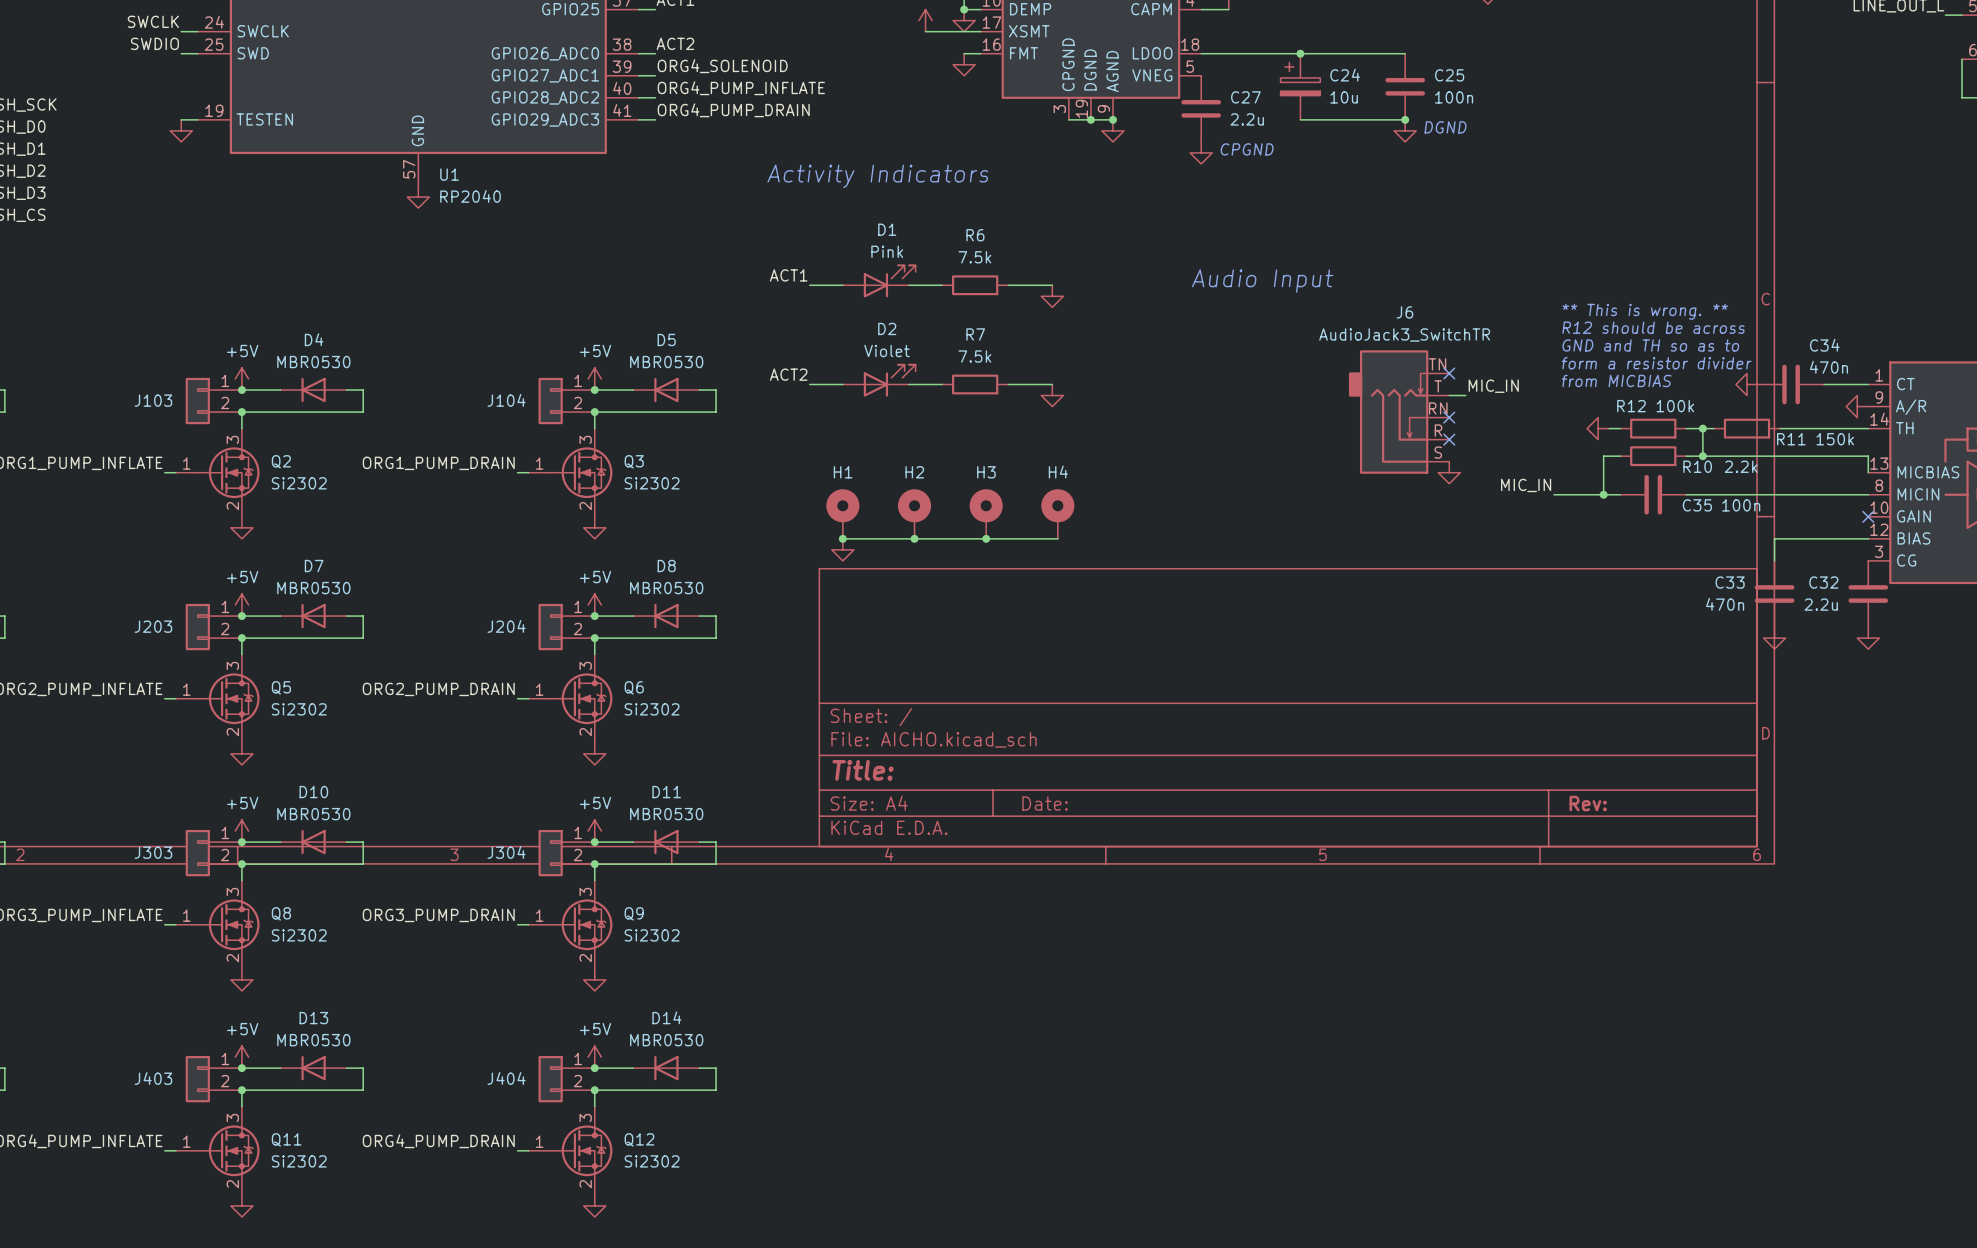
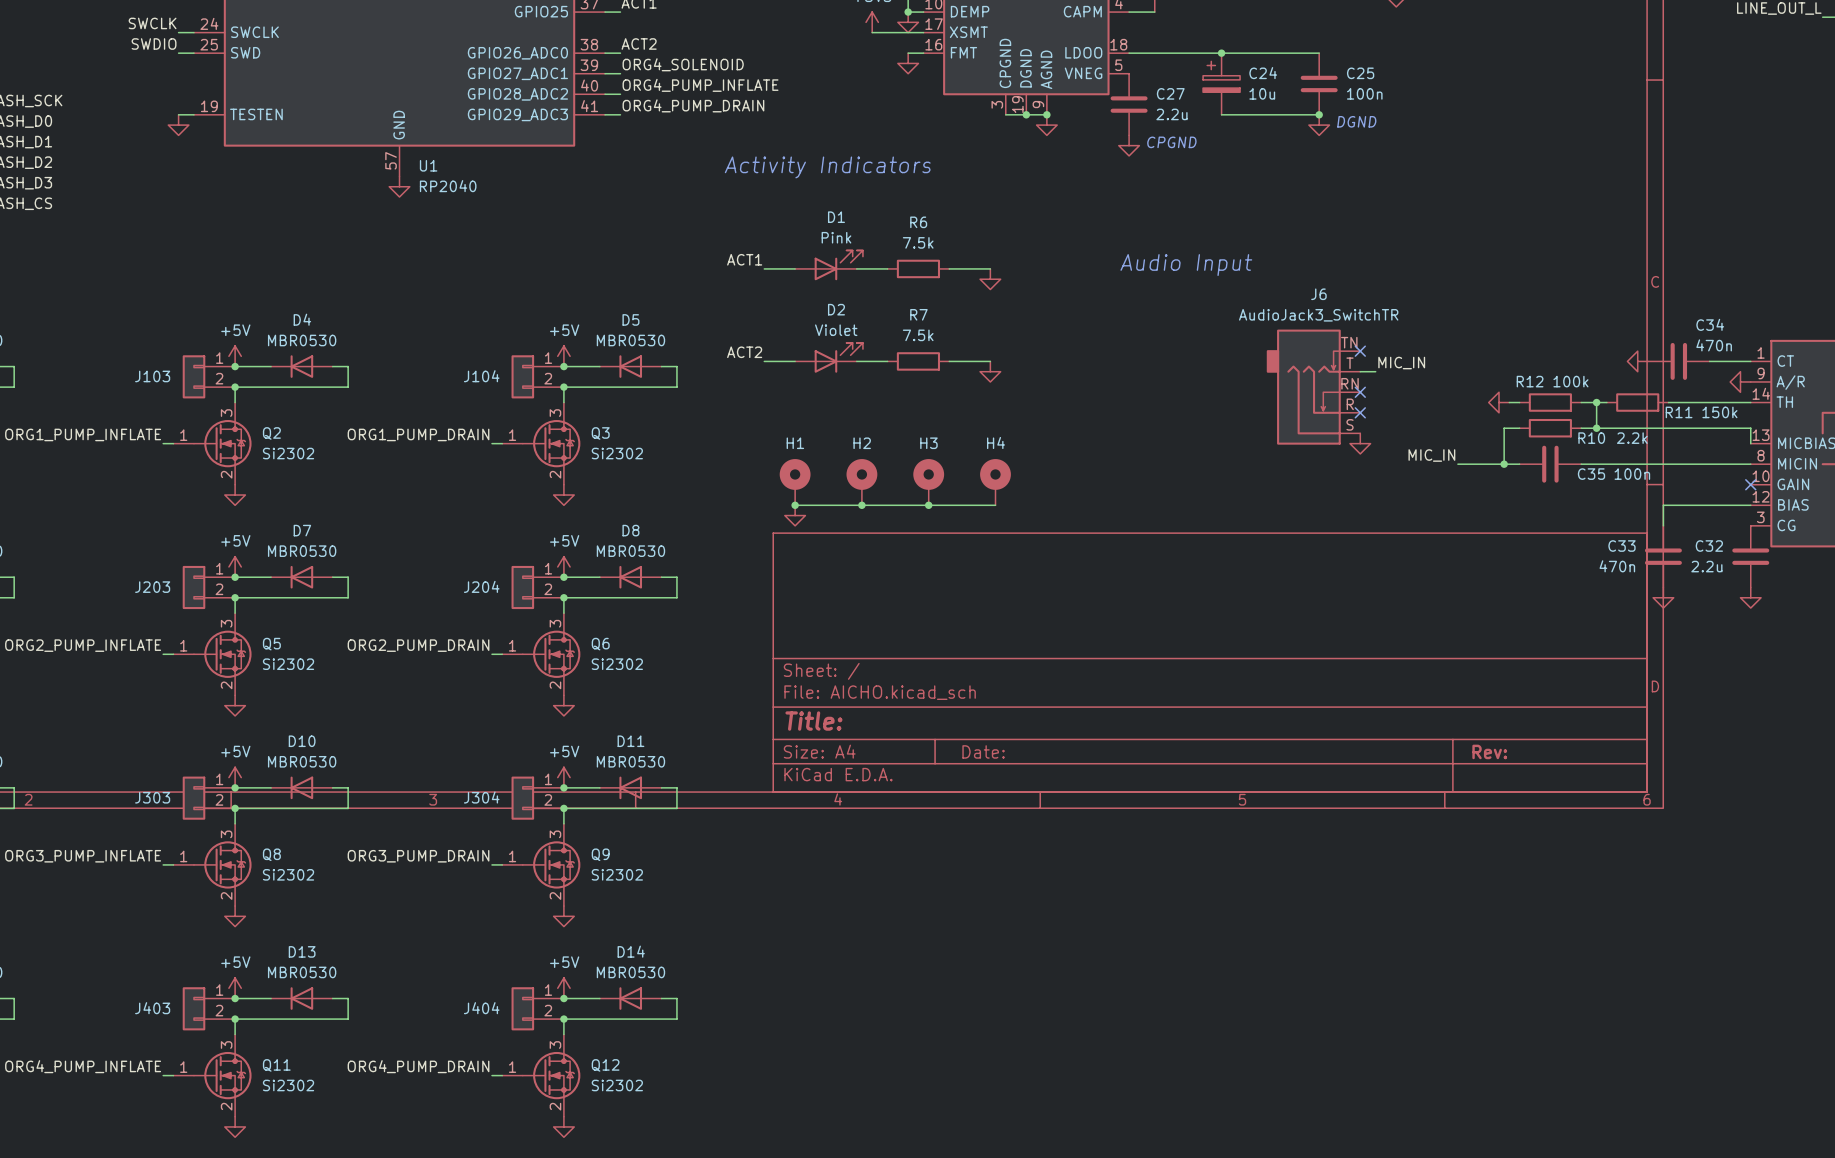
text: ** This is wrong. ** (1645, 311) -> none
text: R12 should be across (1653, 327) -> none
text: GND and TH so as to (1650, 345) -> none
text: form a resistor divider (1656, 363) -> none
text: from MICBIAS (1616, 380) -> none

